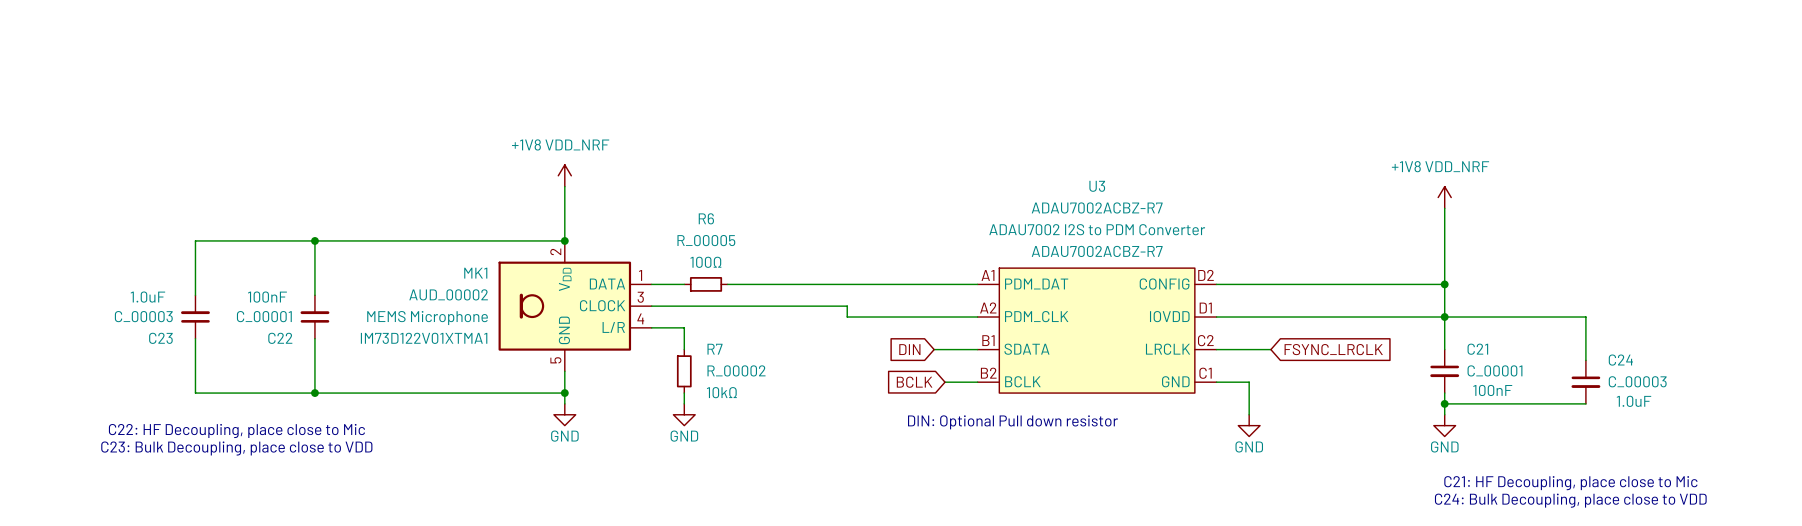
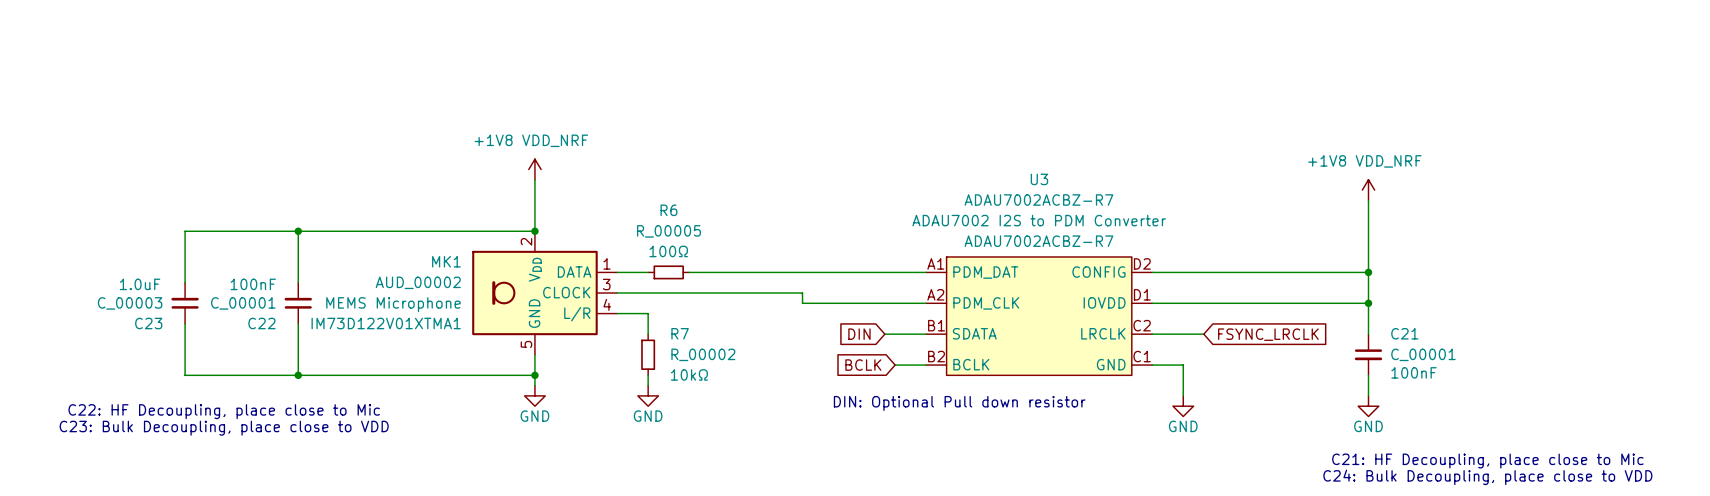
wire: (1444, 317) (1585, 317) (1585, 360) -> none
C24: C_00003 (1585, 382) -> none
wire: (1444, 403) (1585, 403) -> none
junction: (1444, 403) -> none

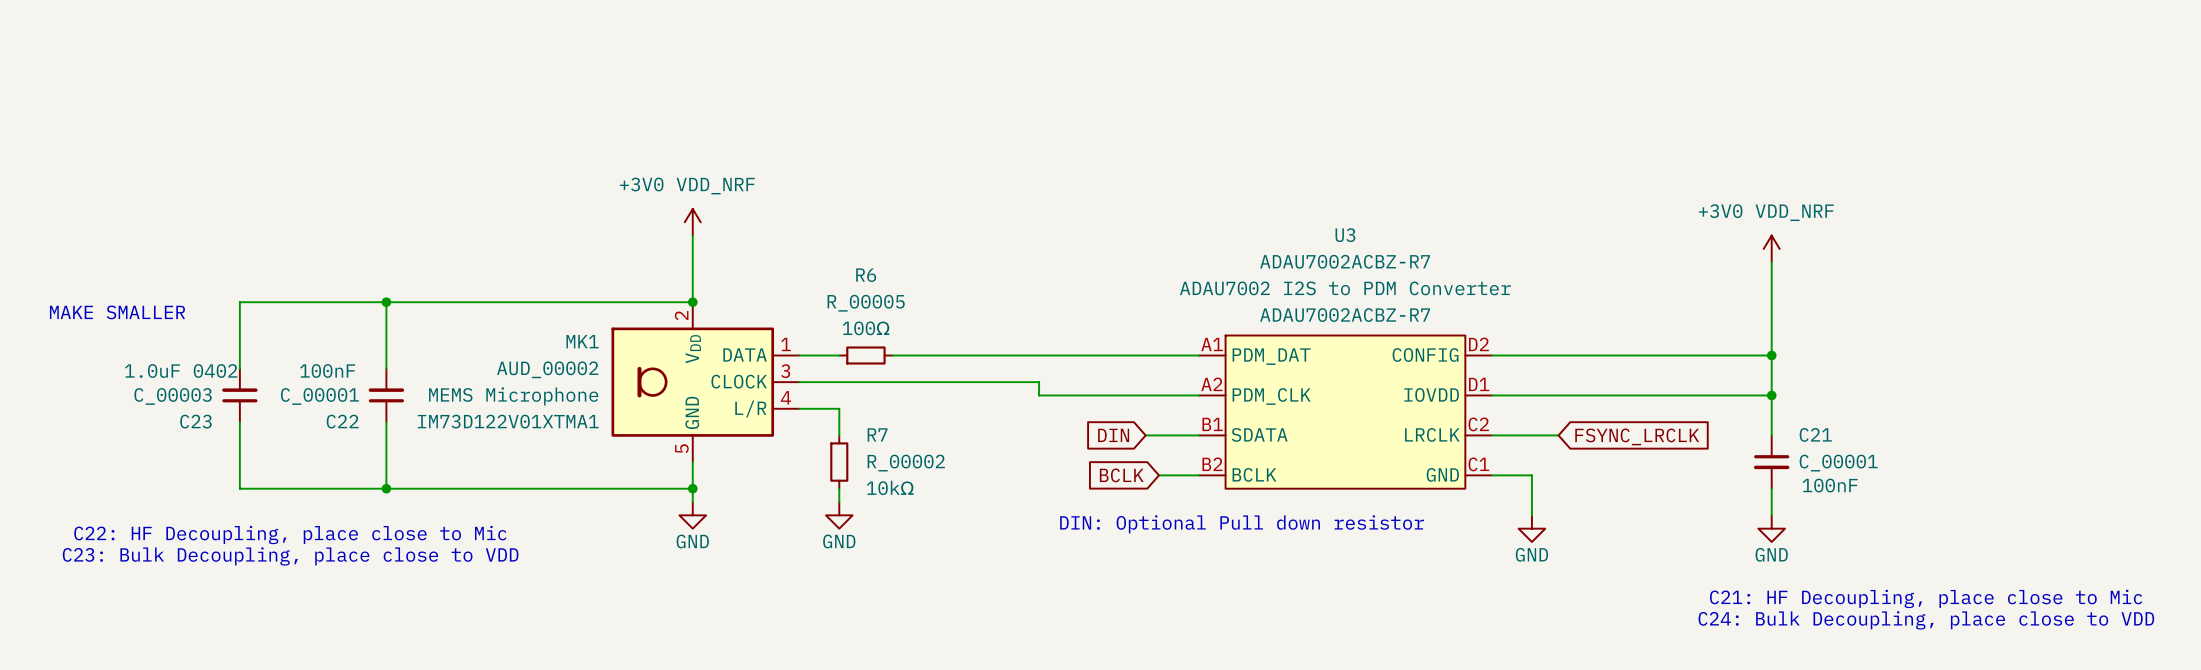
power symbol: +1V8 VDD_NRF (534, 169) -> +3V0 VDD_NRF (692, 222)
power symbol: +1V8 VDD_NRF (1368, 190) -> +3V0 VDD_NRF (1771, 248)
text: none -> MAKE SMALLER (117, 312)
C23 text: 1.0uF (140, 284) -> 1.0uF 0402 (181, 370)

